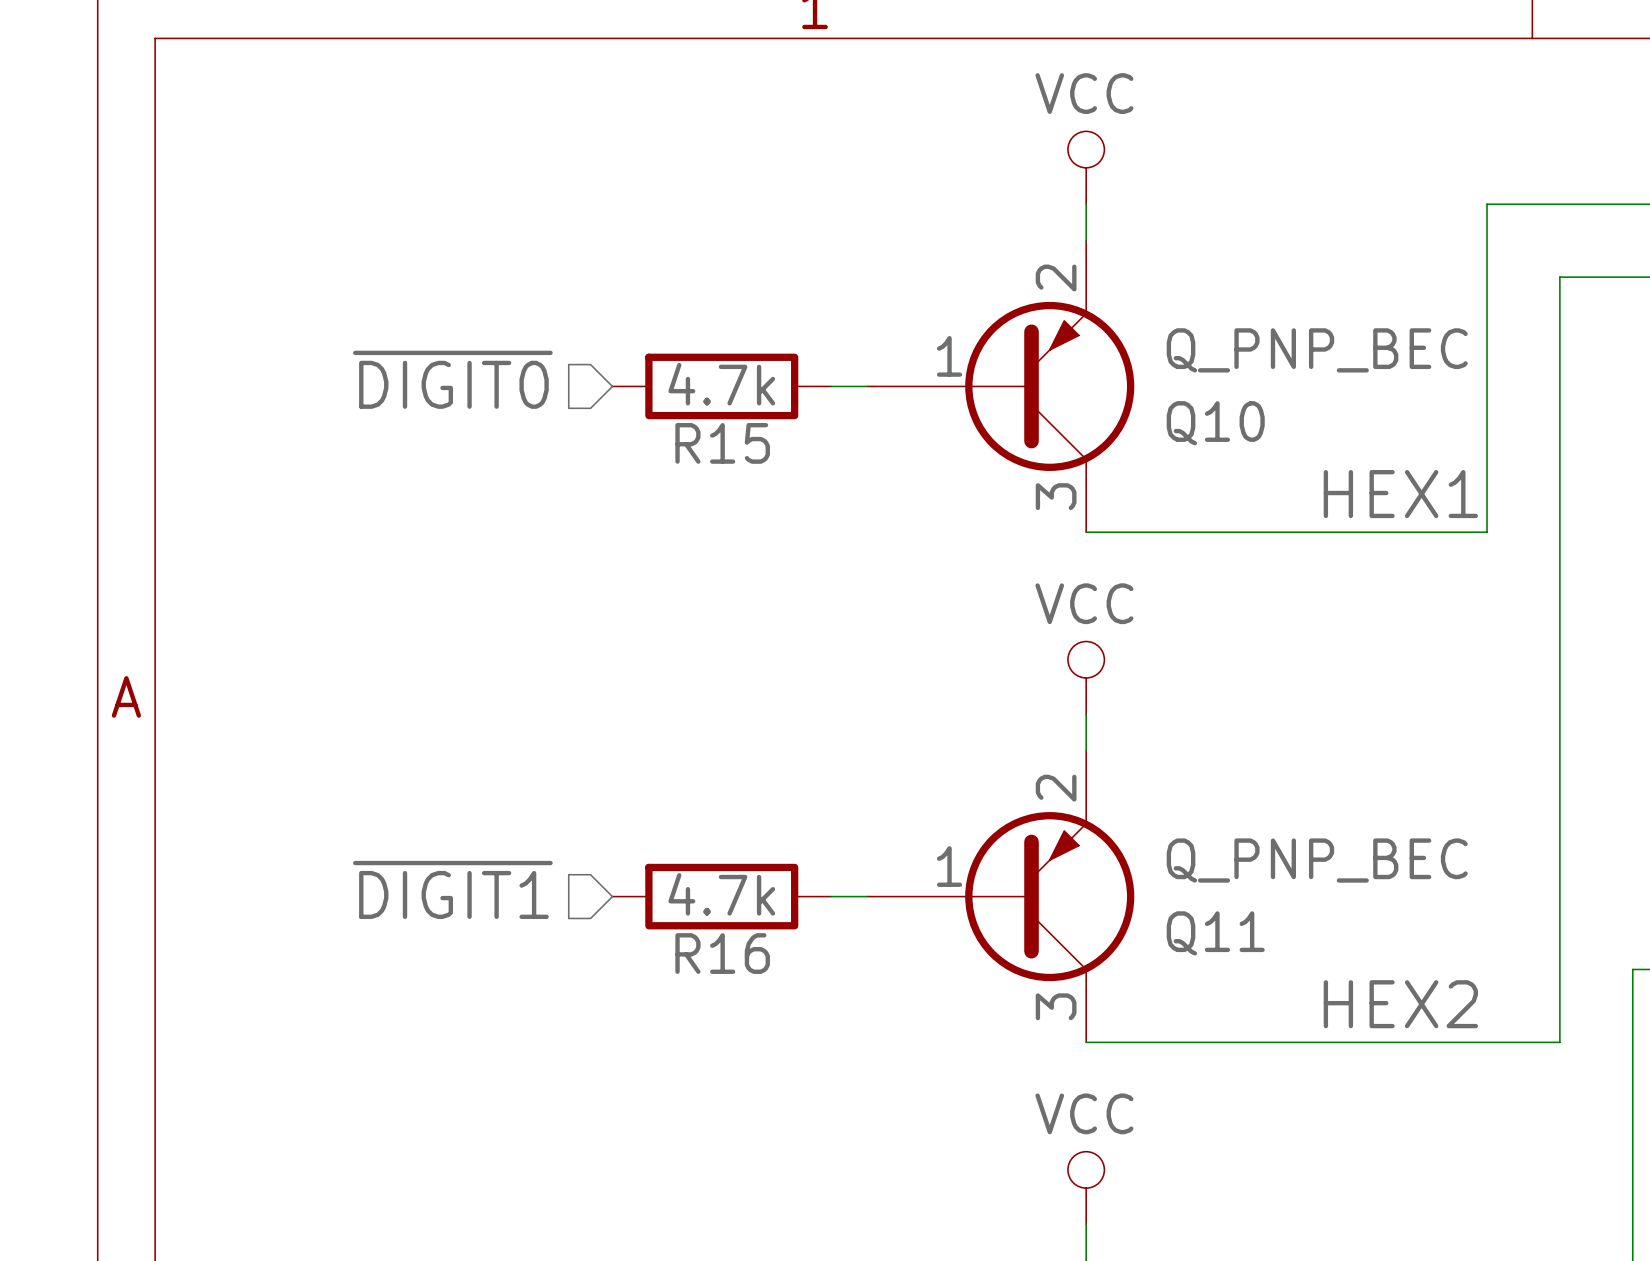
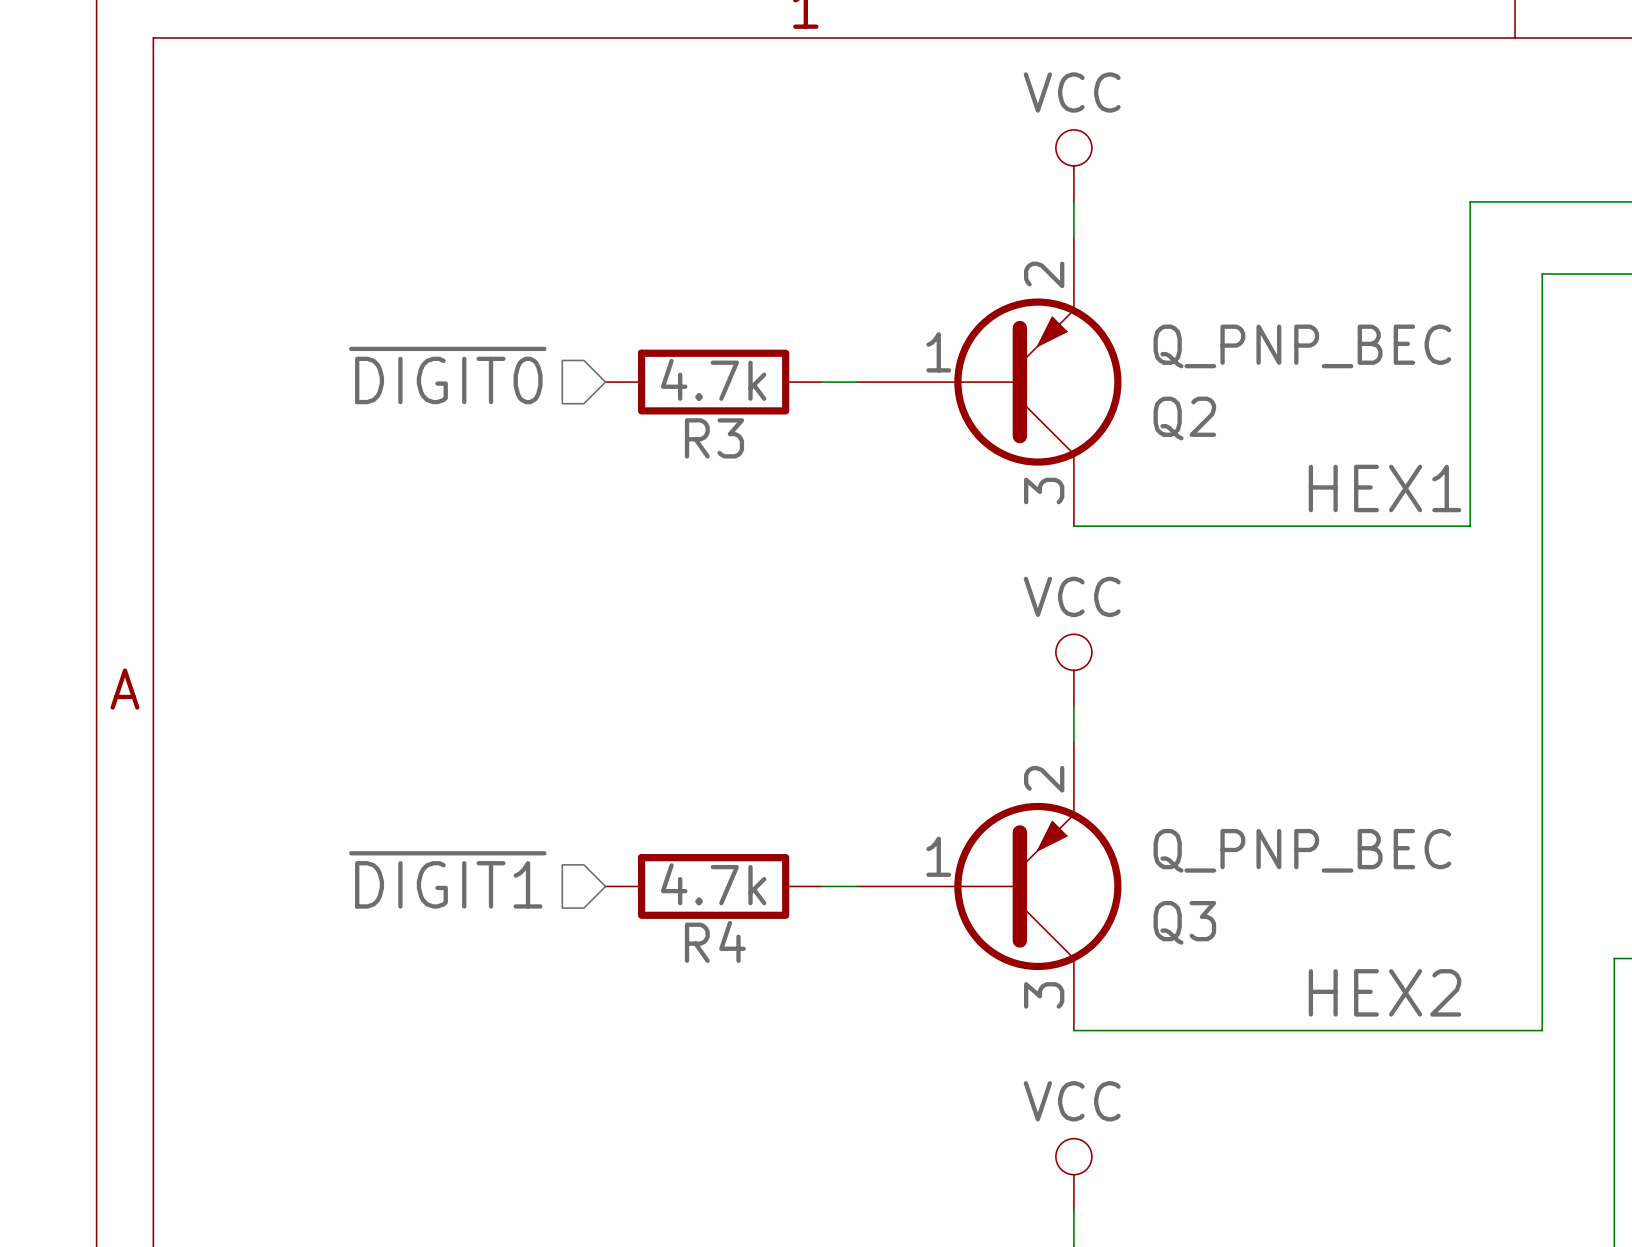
Q10 name: Q10 (1215, 423) -> Q2 (1184, 418)
R15 name: R15 (722, 443) -> R3 (714, 438)
Q11 name: Q11 (1215, 933) -> Q3 (1184, 922)
R16 name: R16 (722, 953) -> R4 (715, 941)

